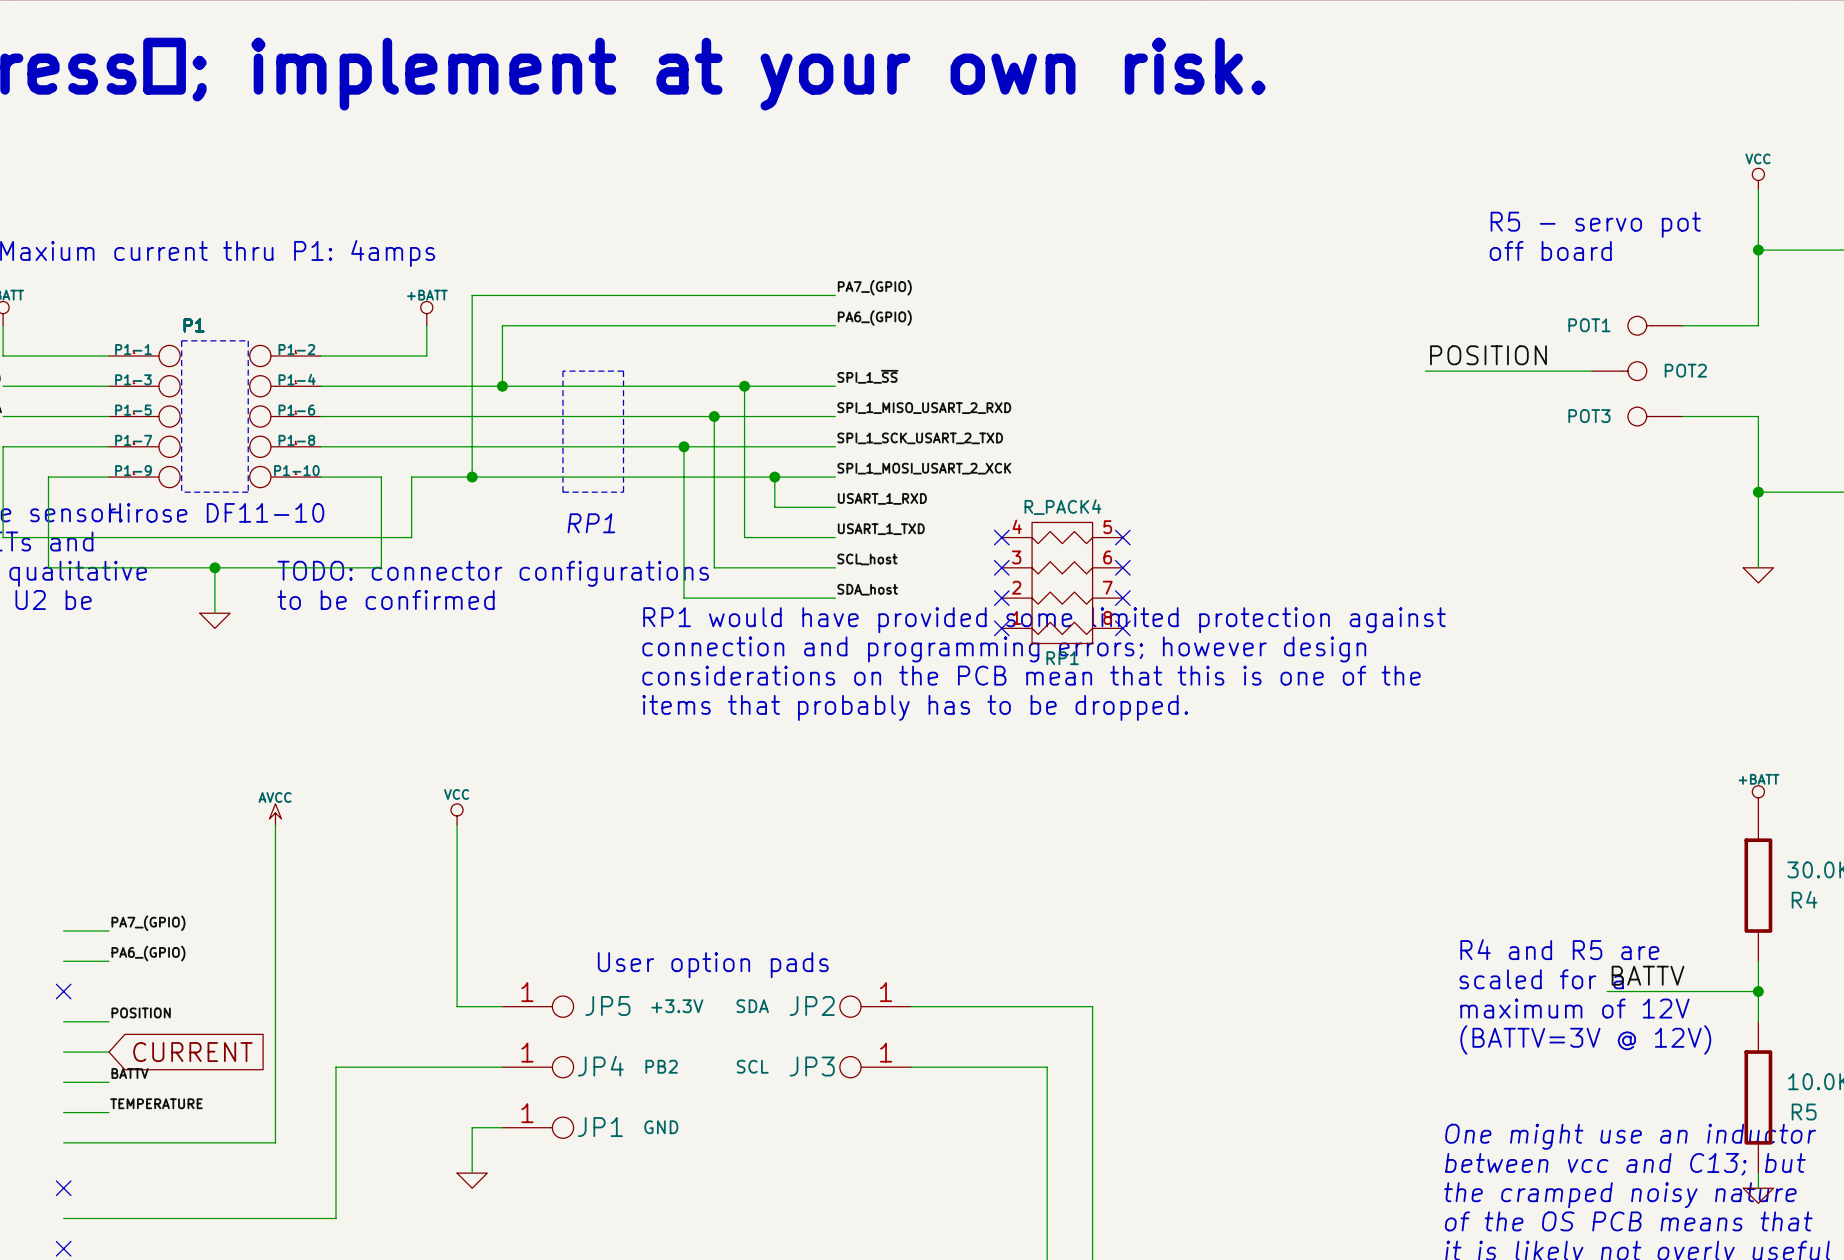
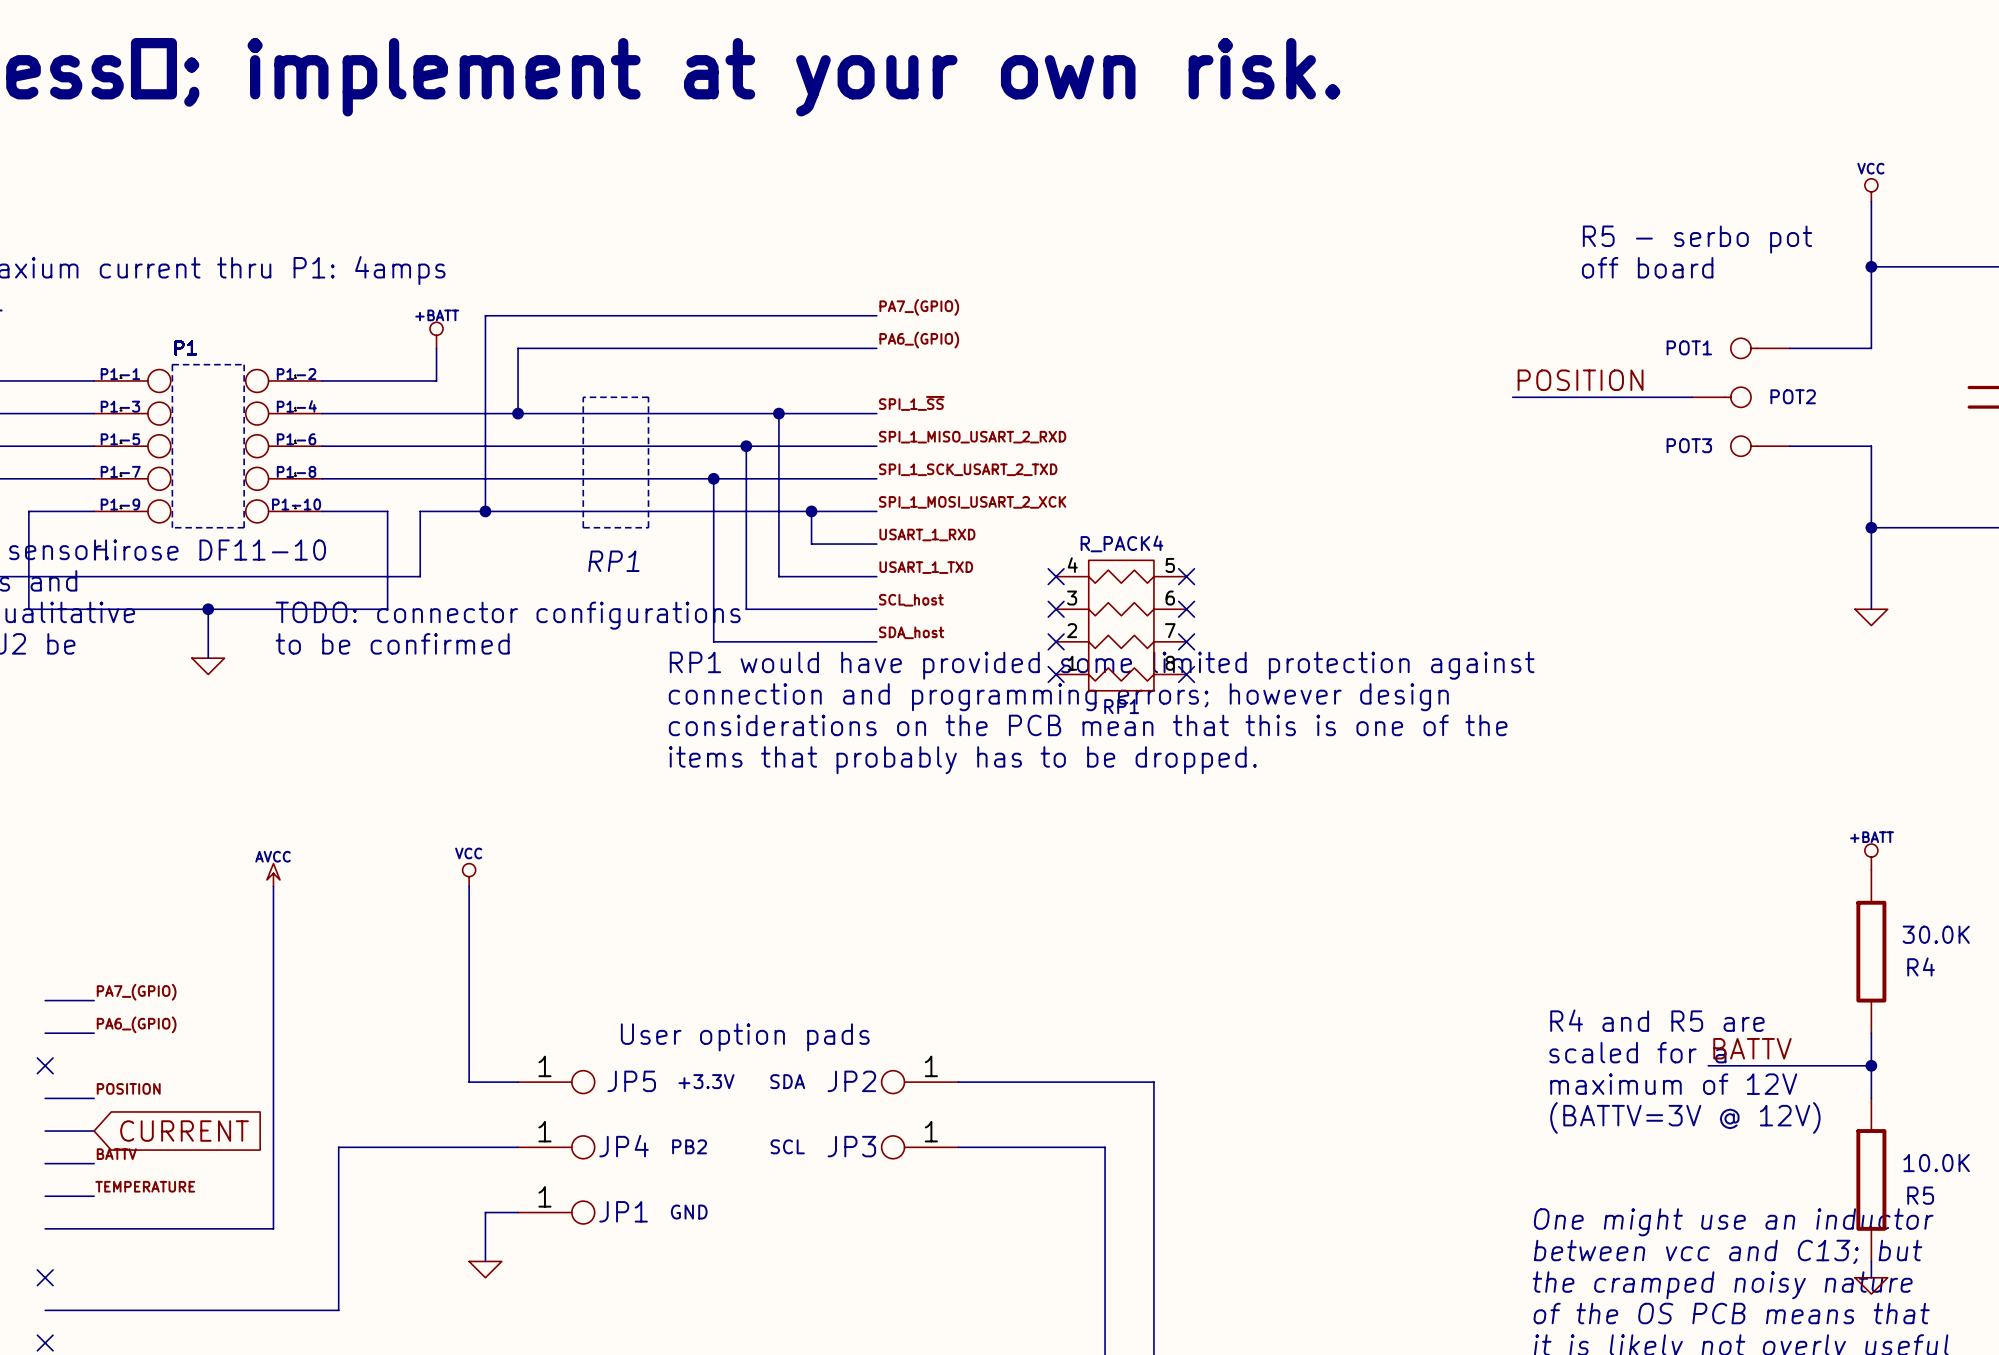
text: R5 - servo pot (1595, 224) -> R5 - serbo pot (1697, 239)

